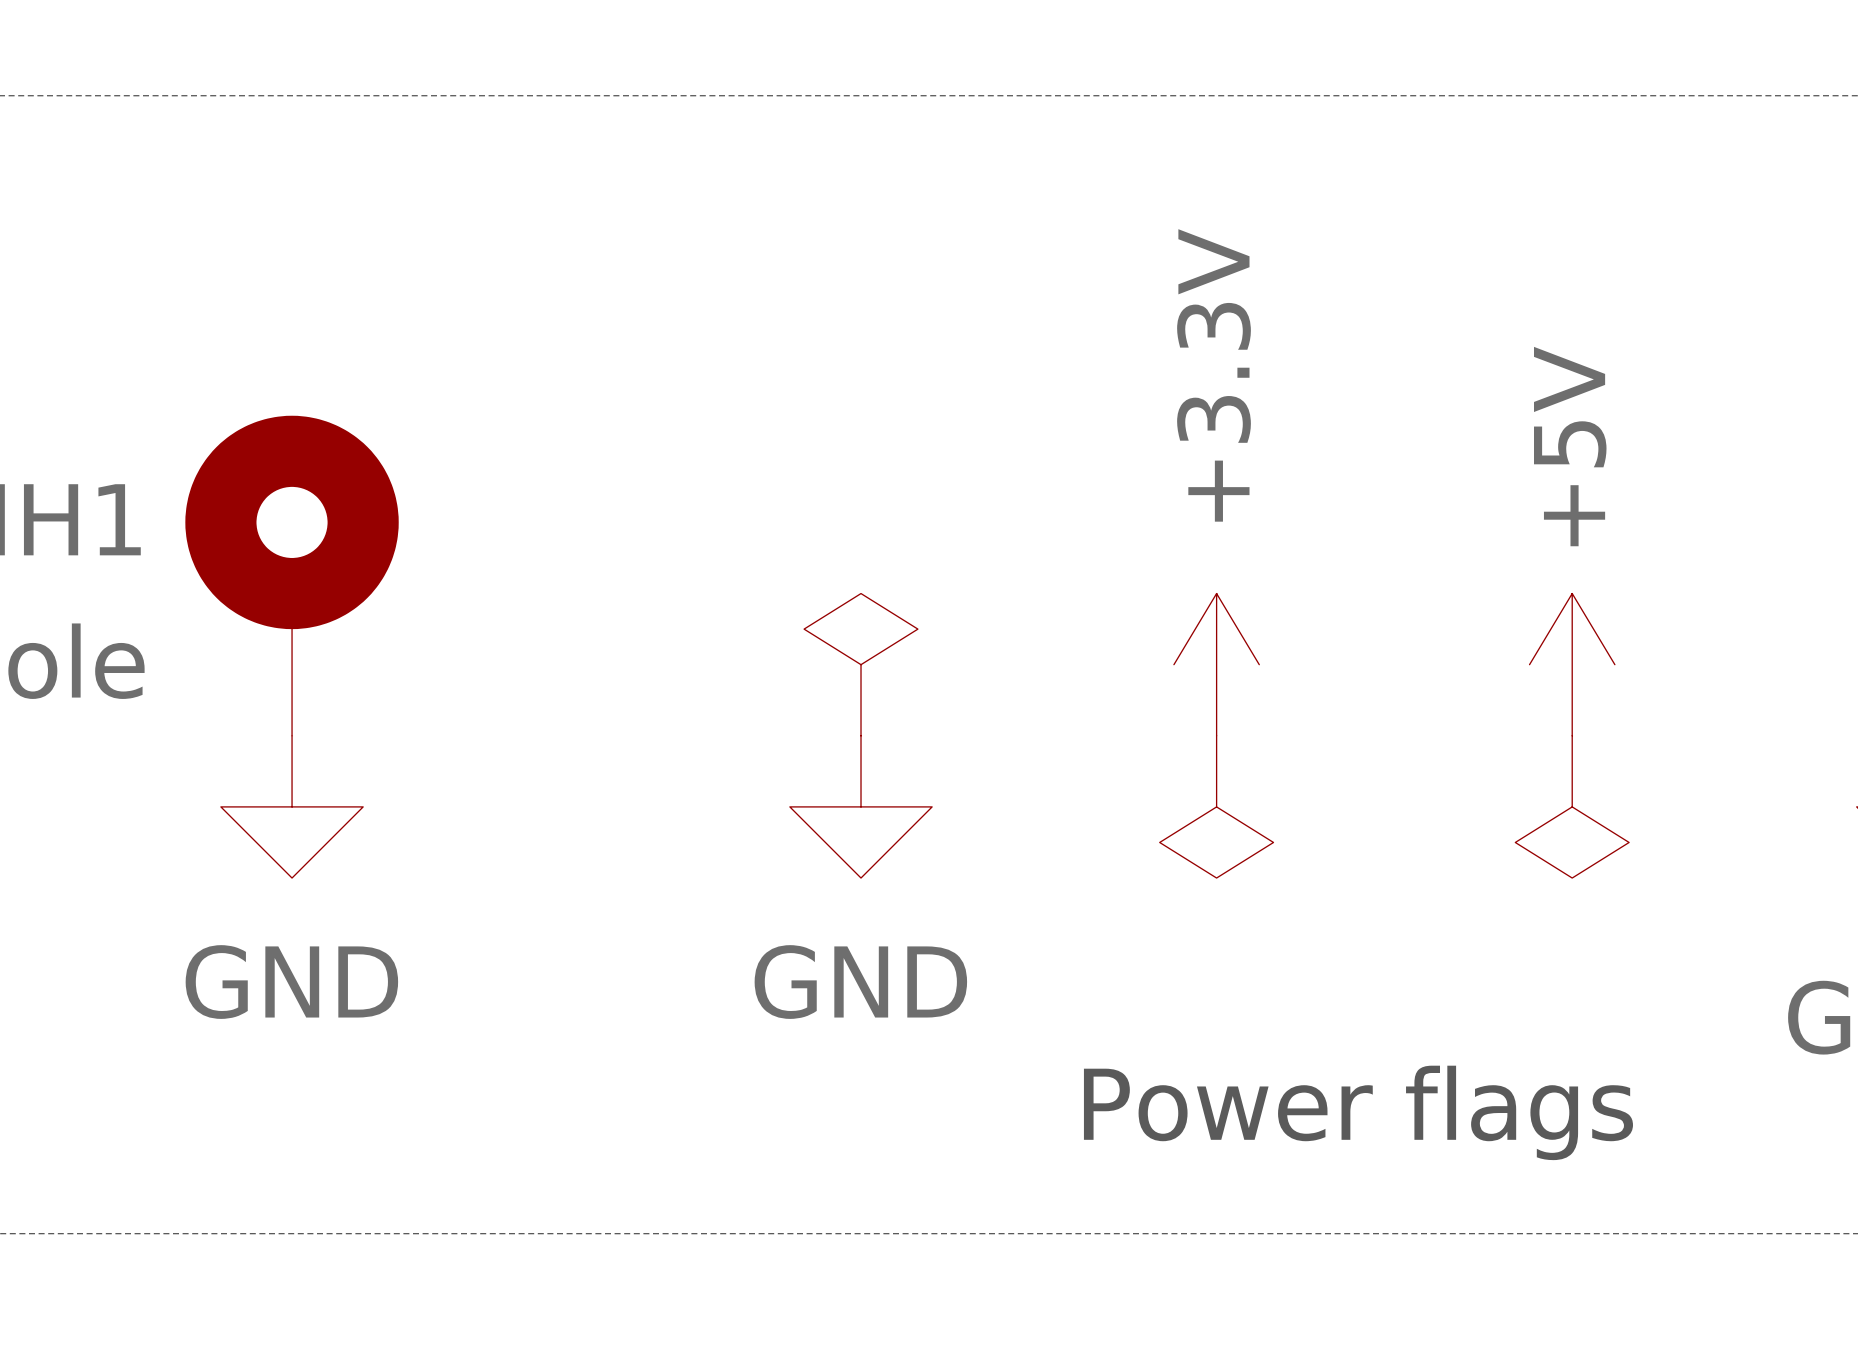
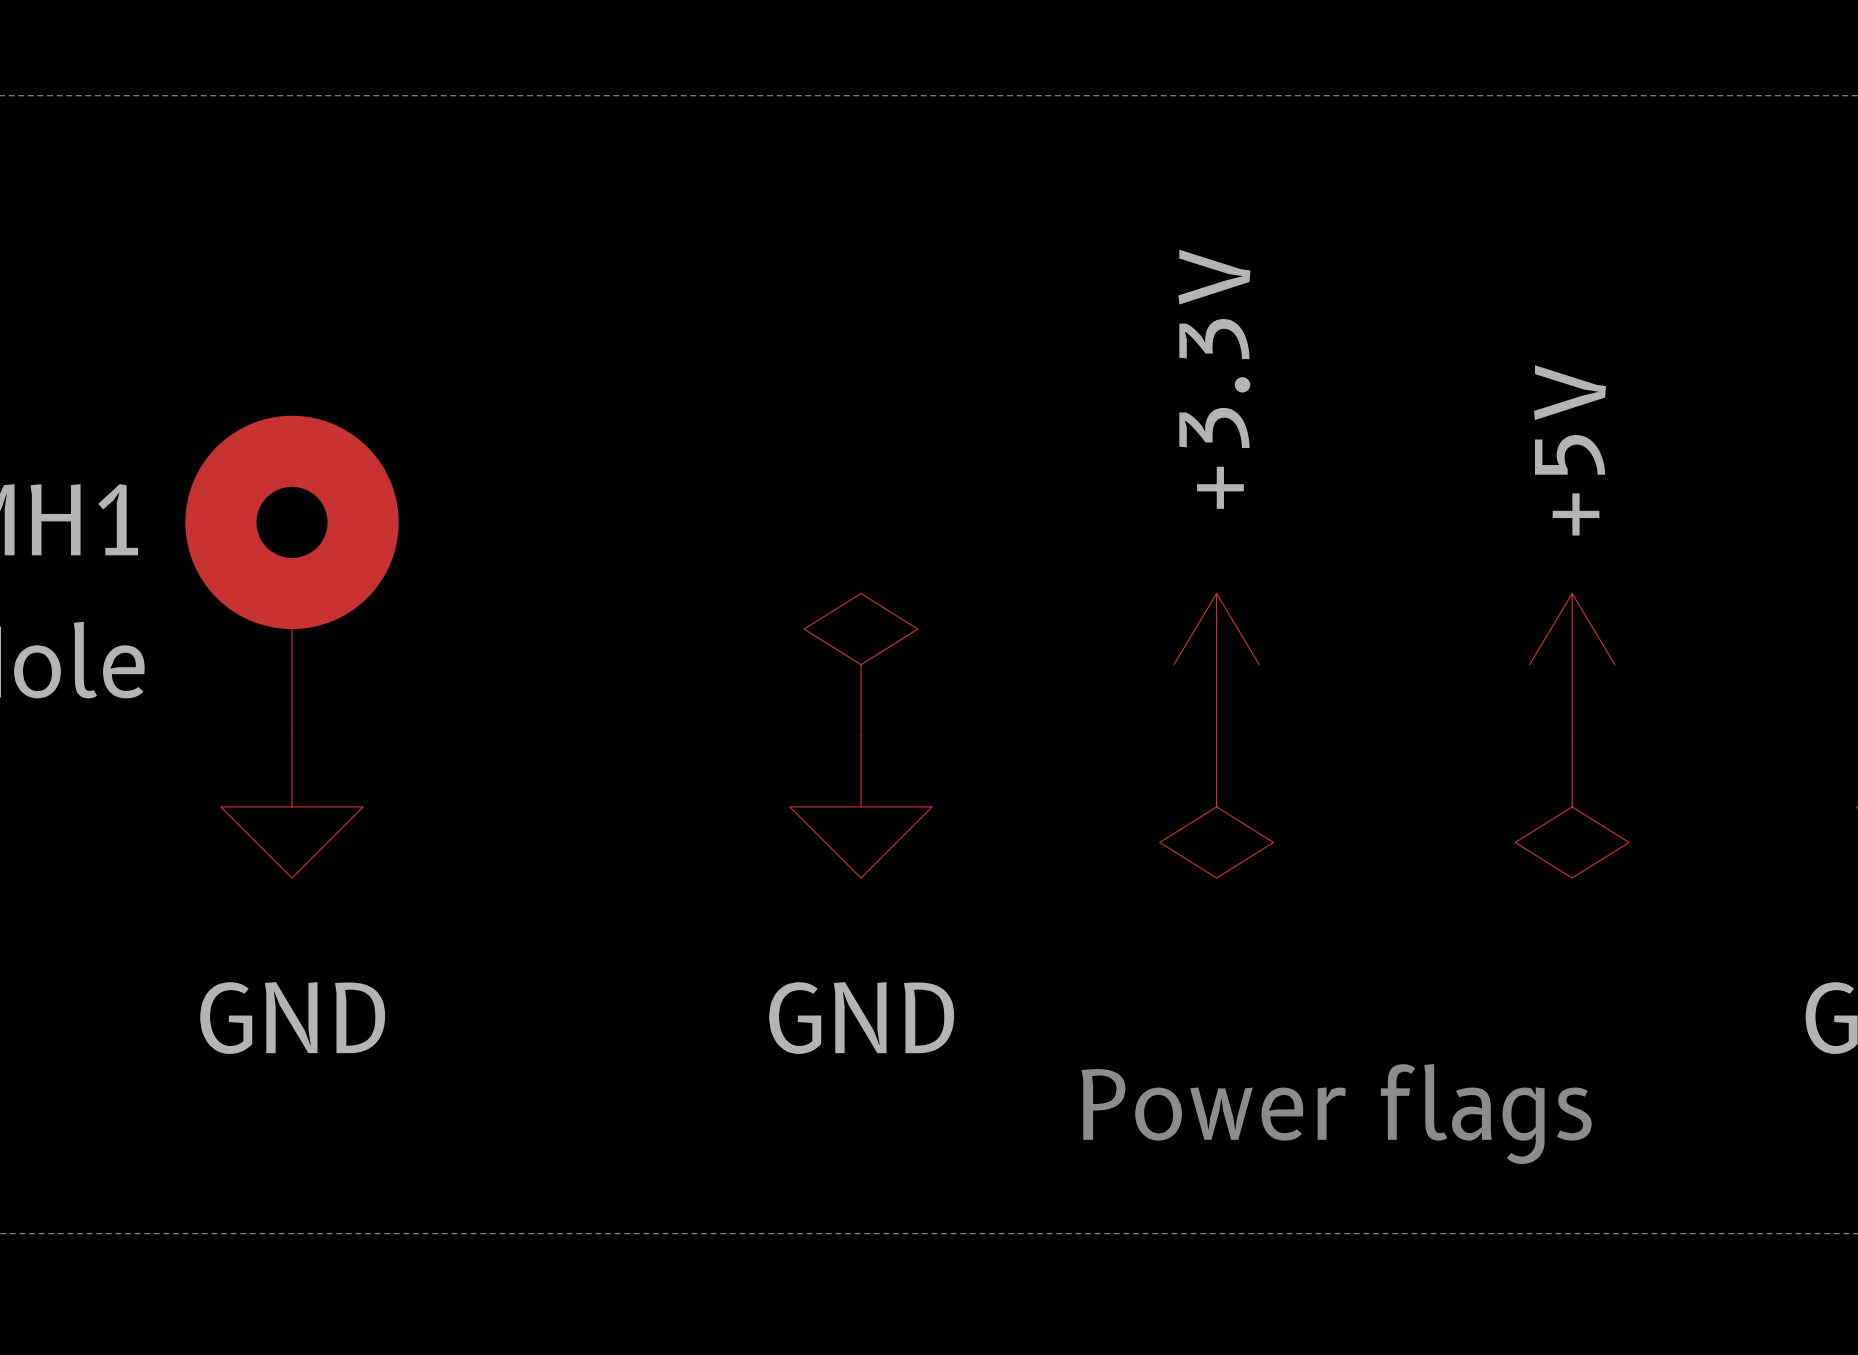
power symbol text position: GND (291, 982) -> GND (292, 1018)
power symbol text position: GND (860, 982) -> GND (861, 1018)

